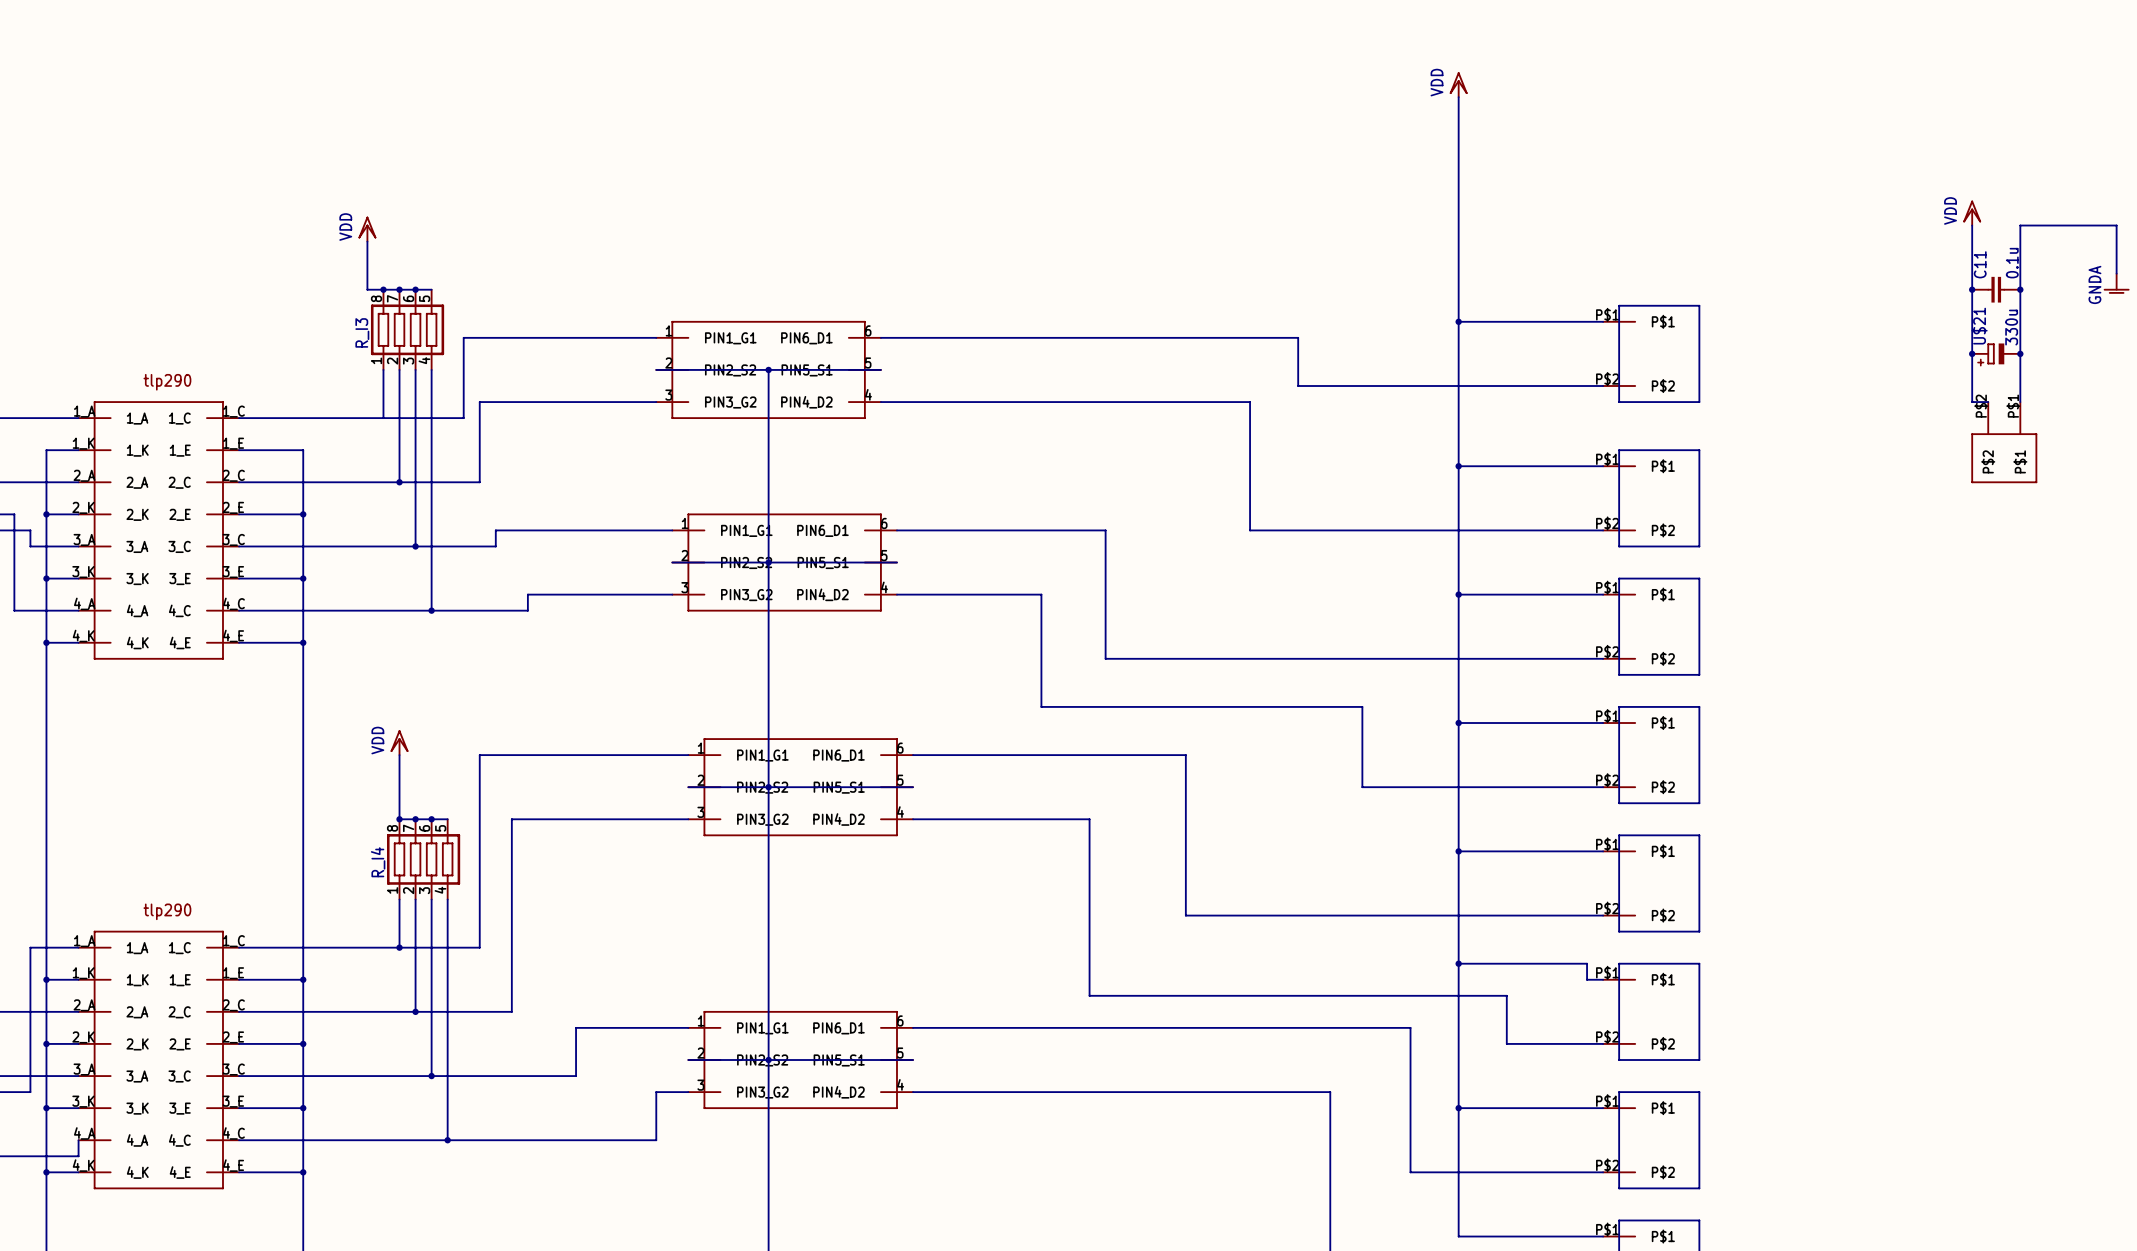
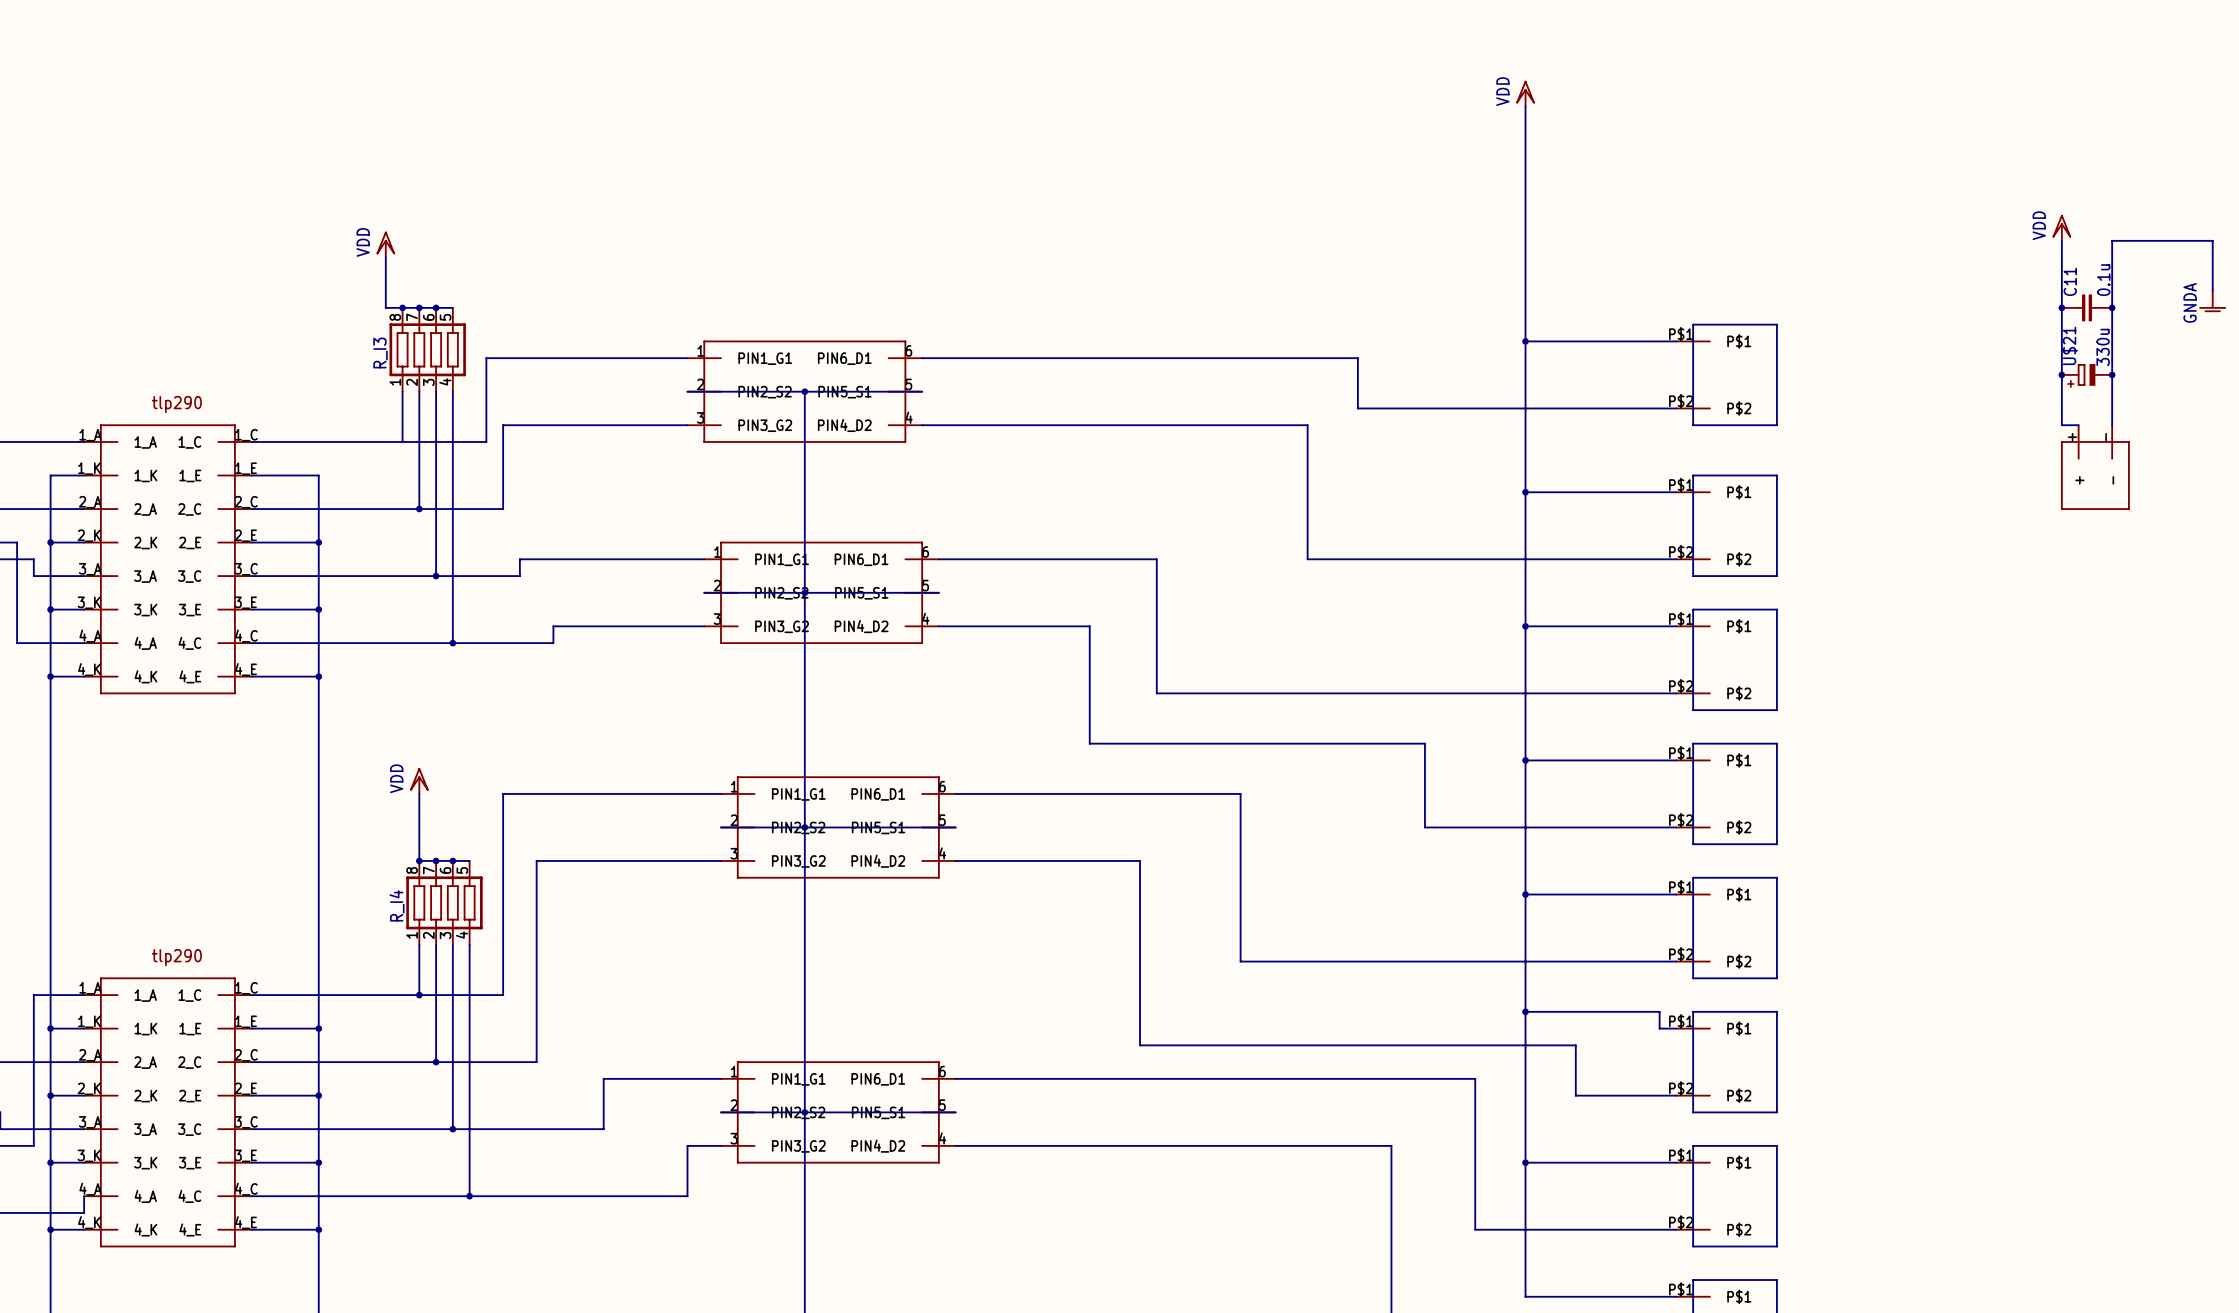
part symbol: [1971, 402, 2038, 484] -> [2061, 425, 2130, 510]

